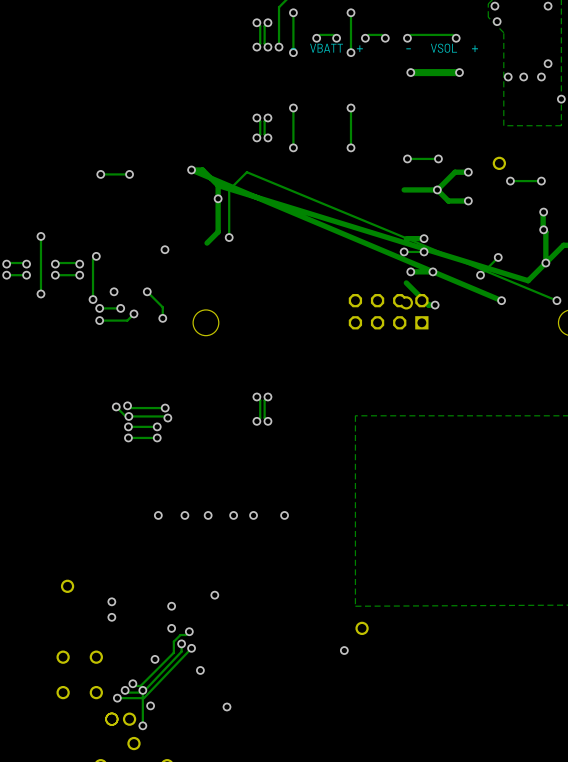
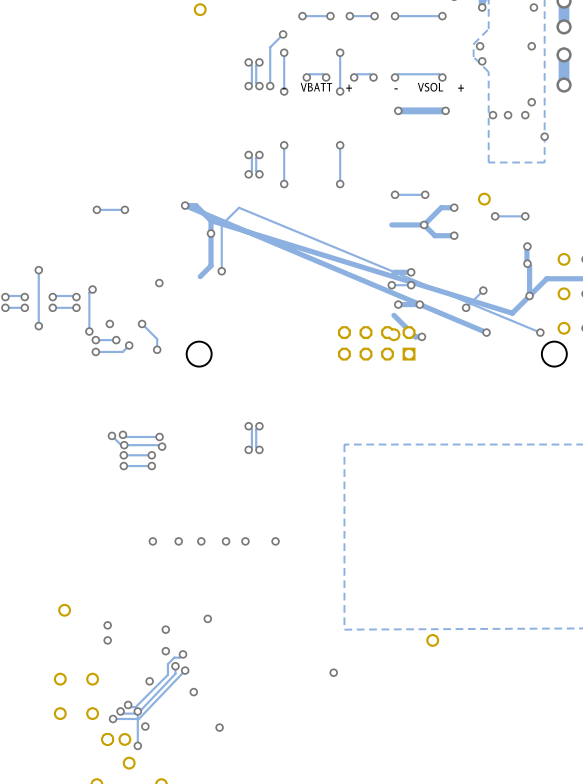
part position: (362, 628) -> (432, 640)

